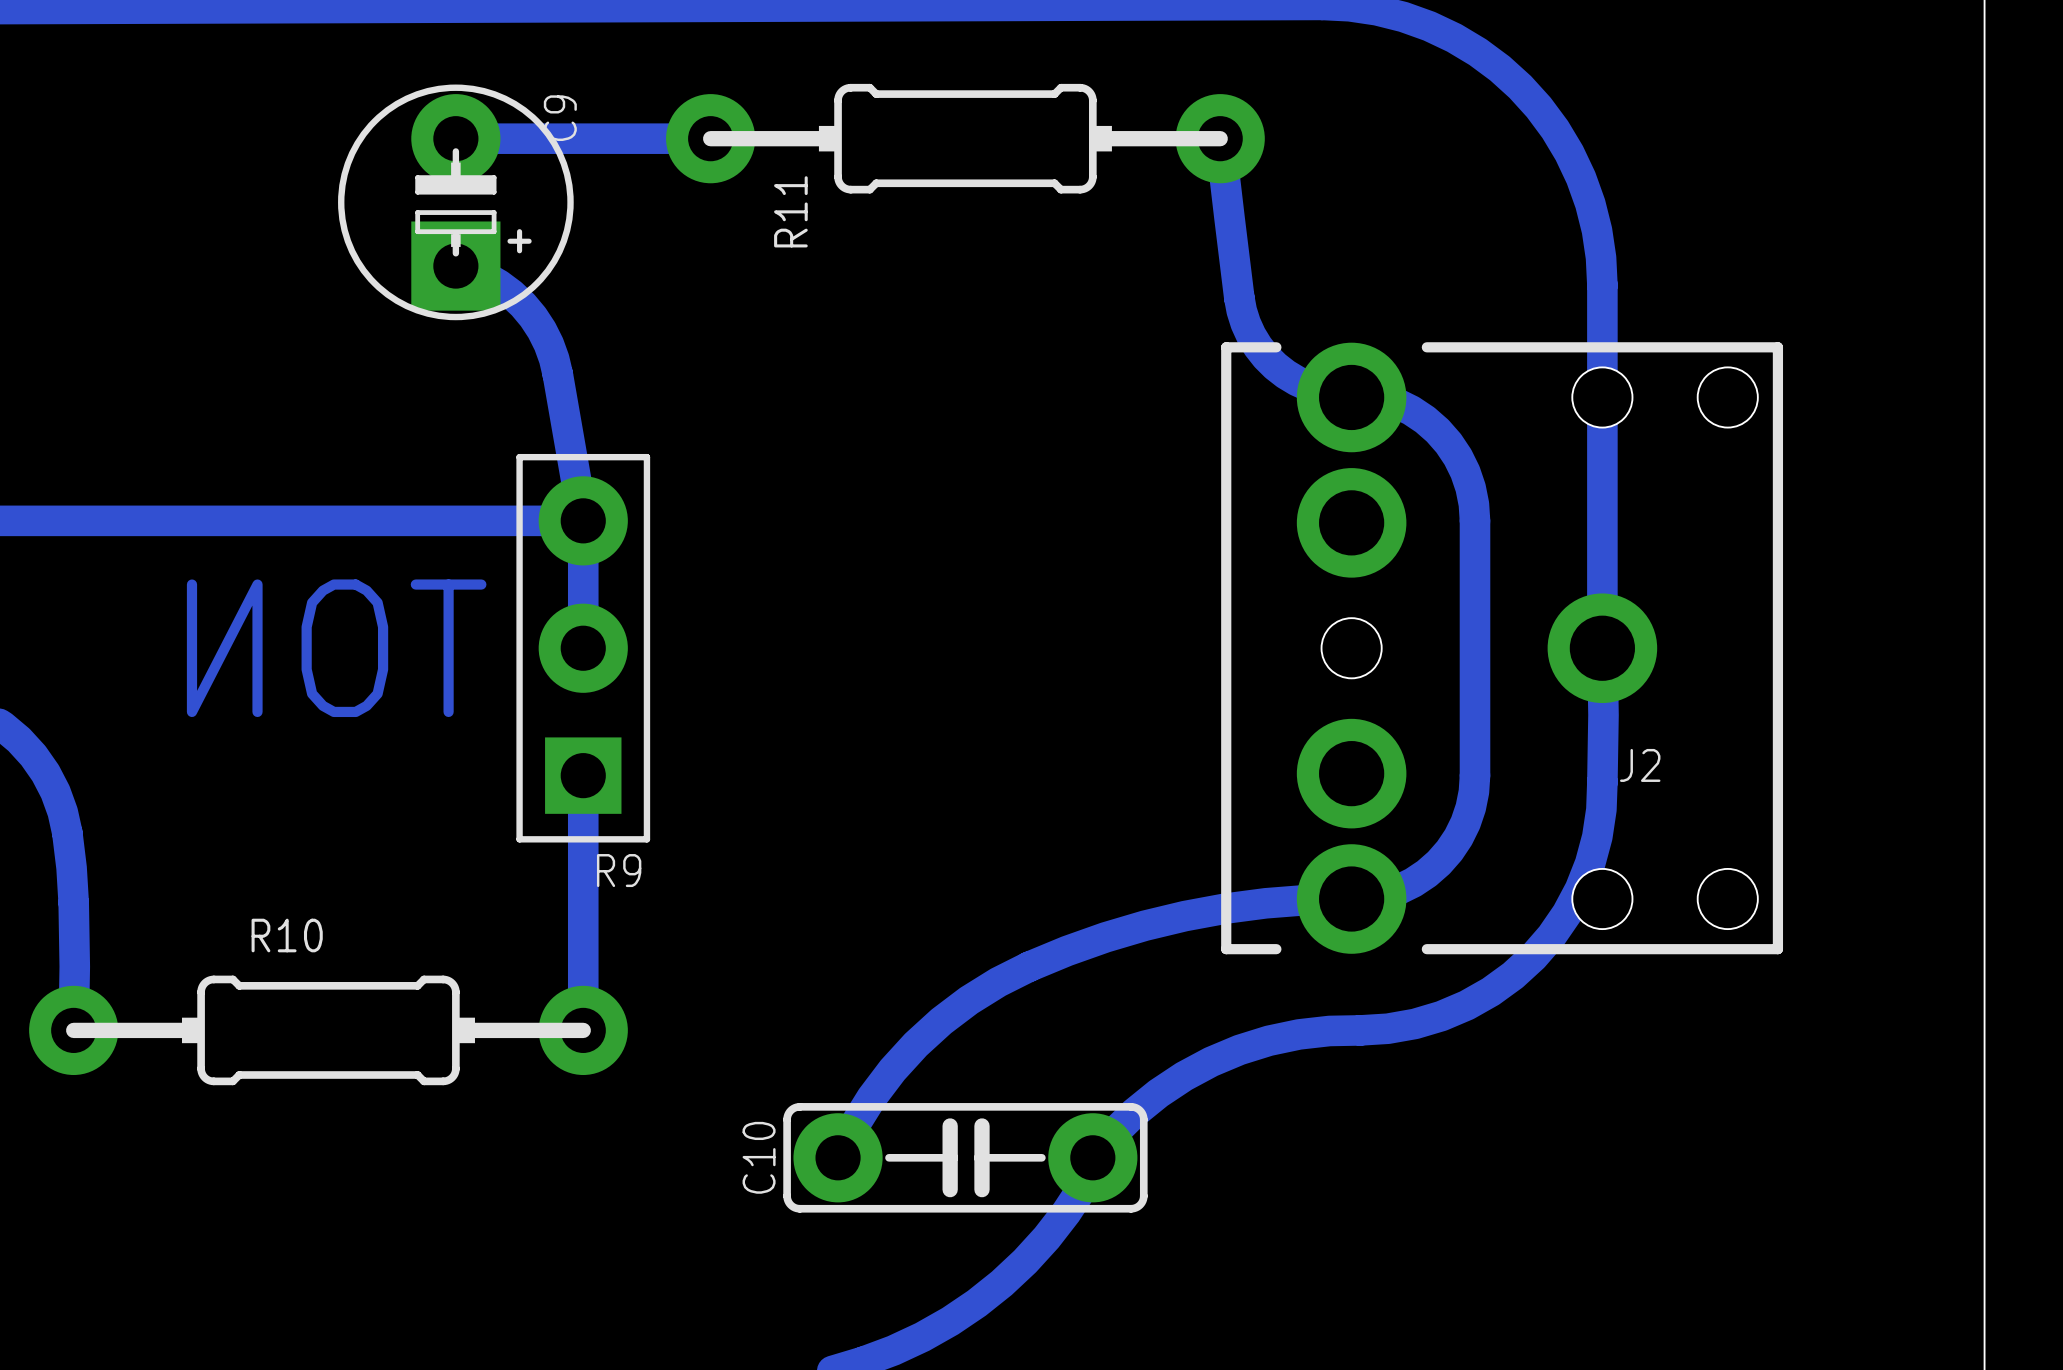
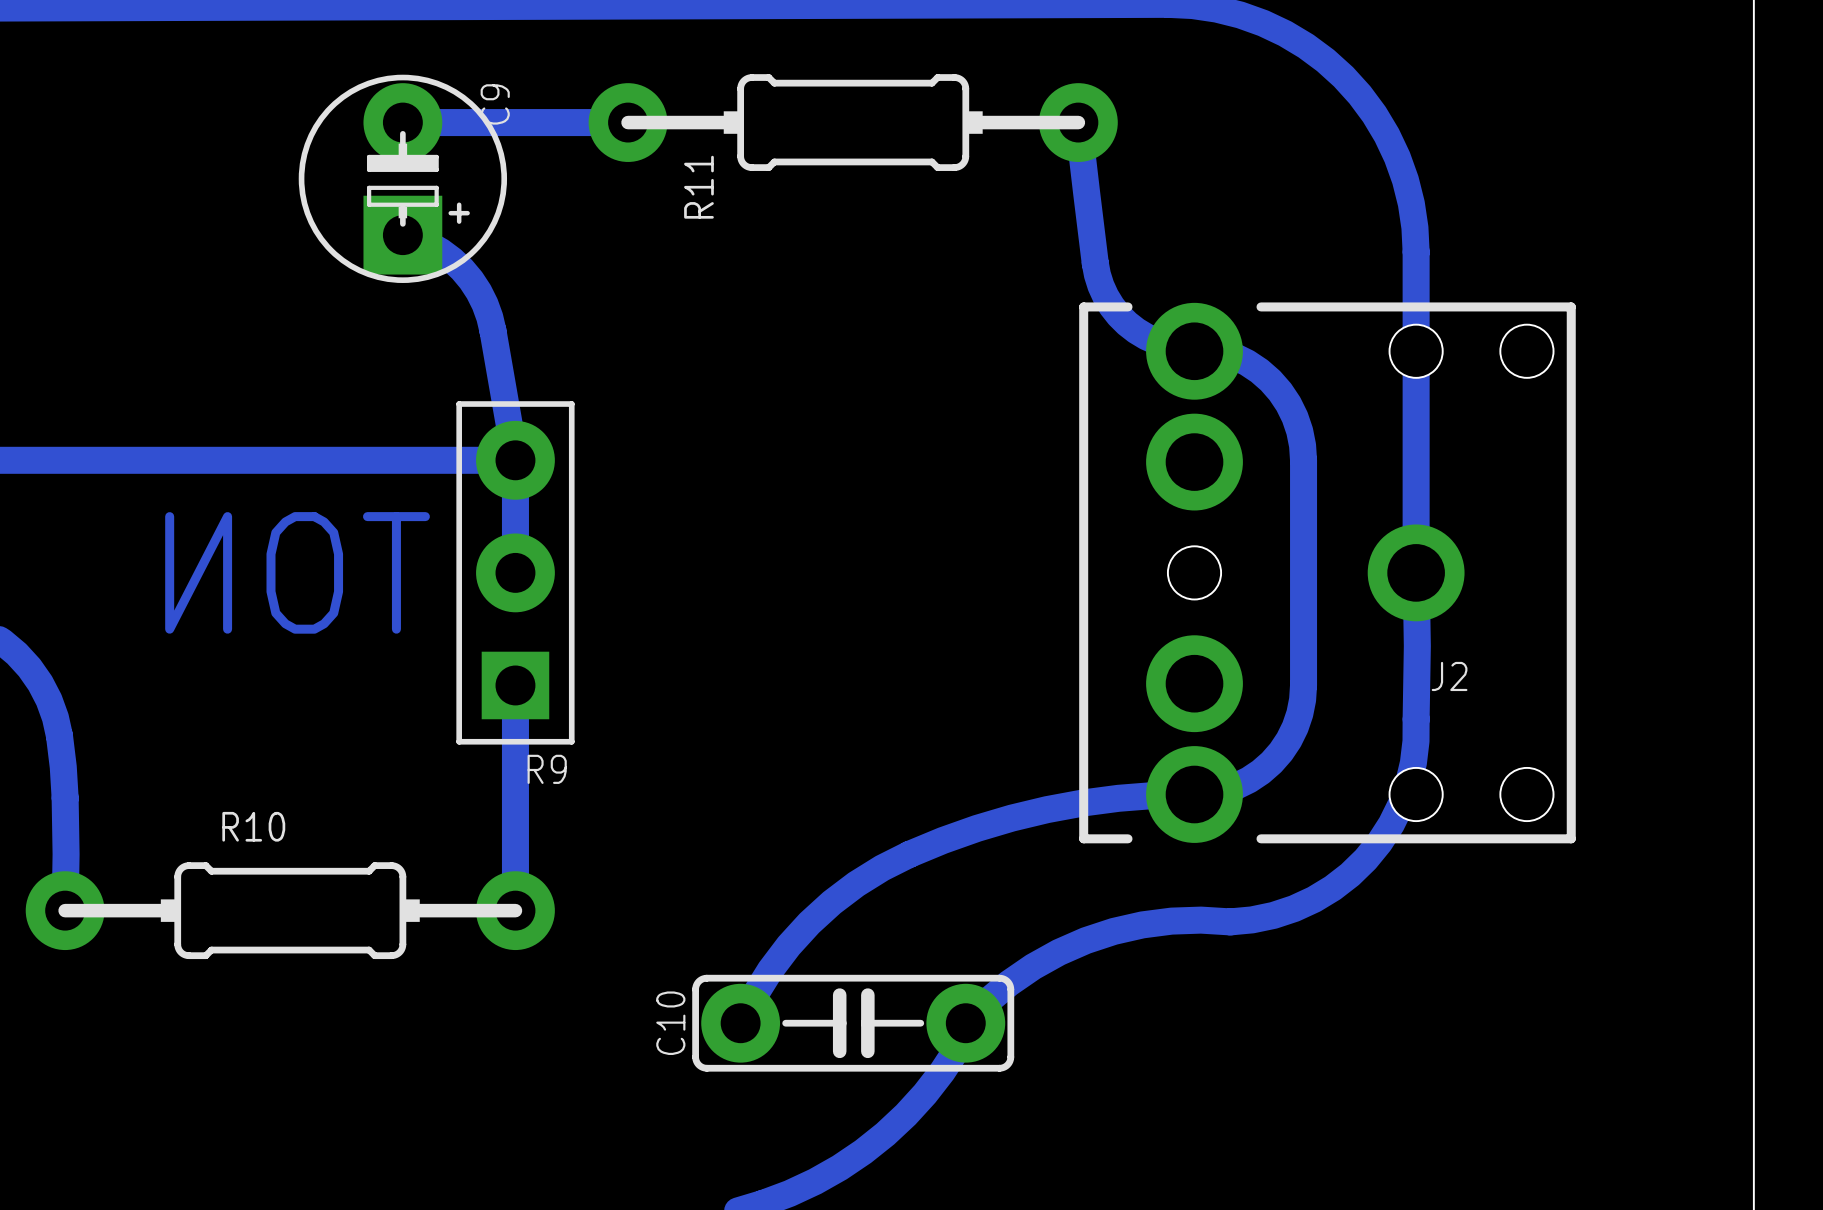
bottom track: (1602, 648) (1602, 782) (1601, 809) (1597, 836) (1590, 863) (1580, 889) (1567, 913) (1551, 936) (1533, 956) (1513, 975) (1490, 991) (1466, 1005) (1441, 1016) (1414, 1023) (1387, 1028) (1299, 1034) (1268, 1040) (1211, 1061) (1184, 1076) (1134, 1112) (1092, 1157) -> (1416, 572) (1416, 741) (1413, 762) (1401, 804) (1391, 824) (1365, 859) (1332, 888) (1314, 899) (1273, 915) (1230, 921) (1201, 920) (1142, 924) (1085, 940) (1033, 966) (986, 1002) (965, 1023)

